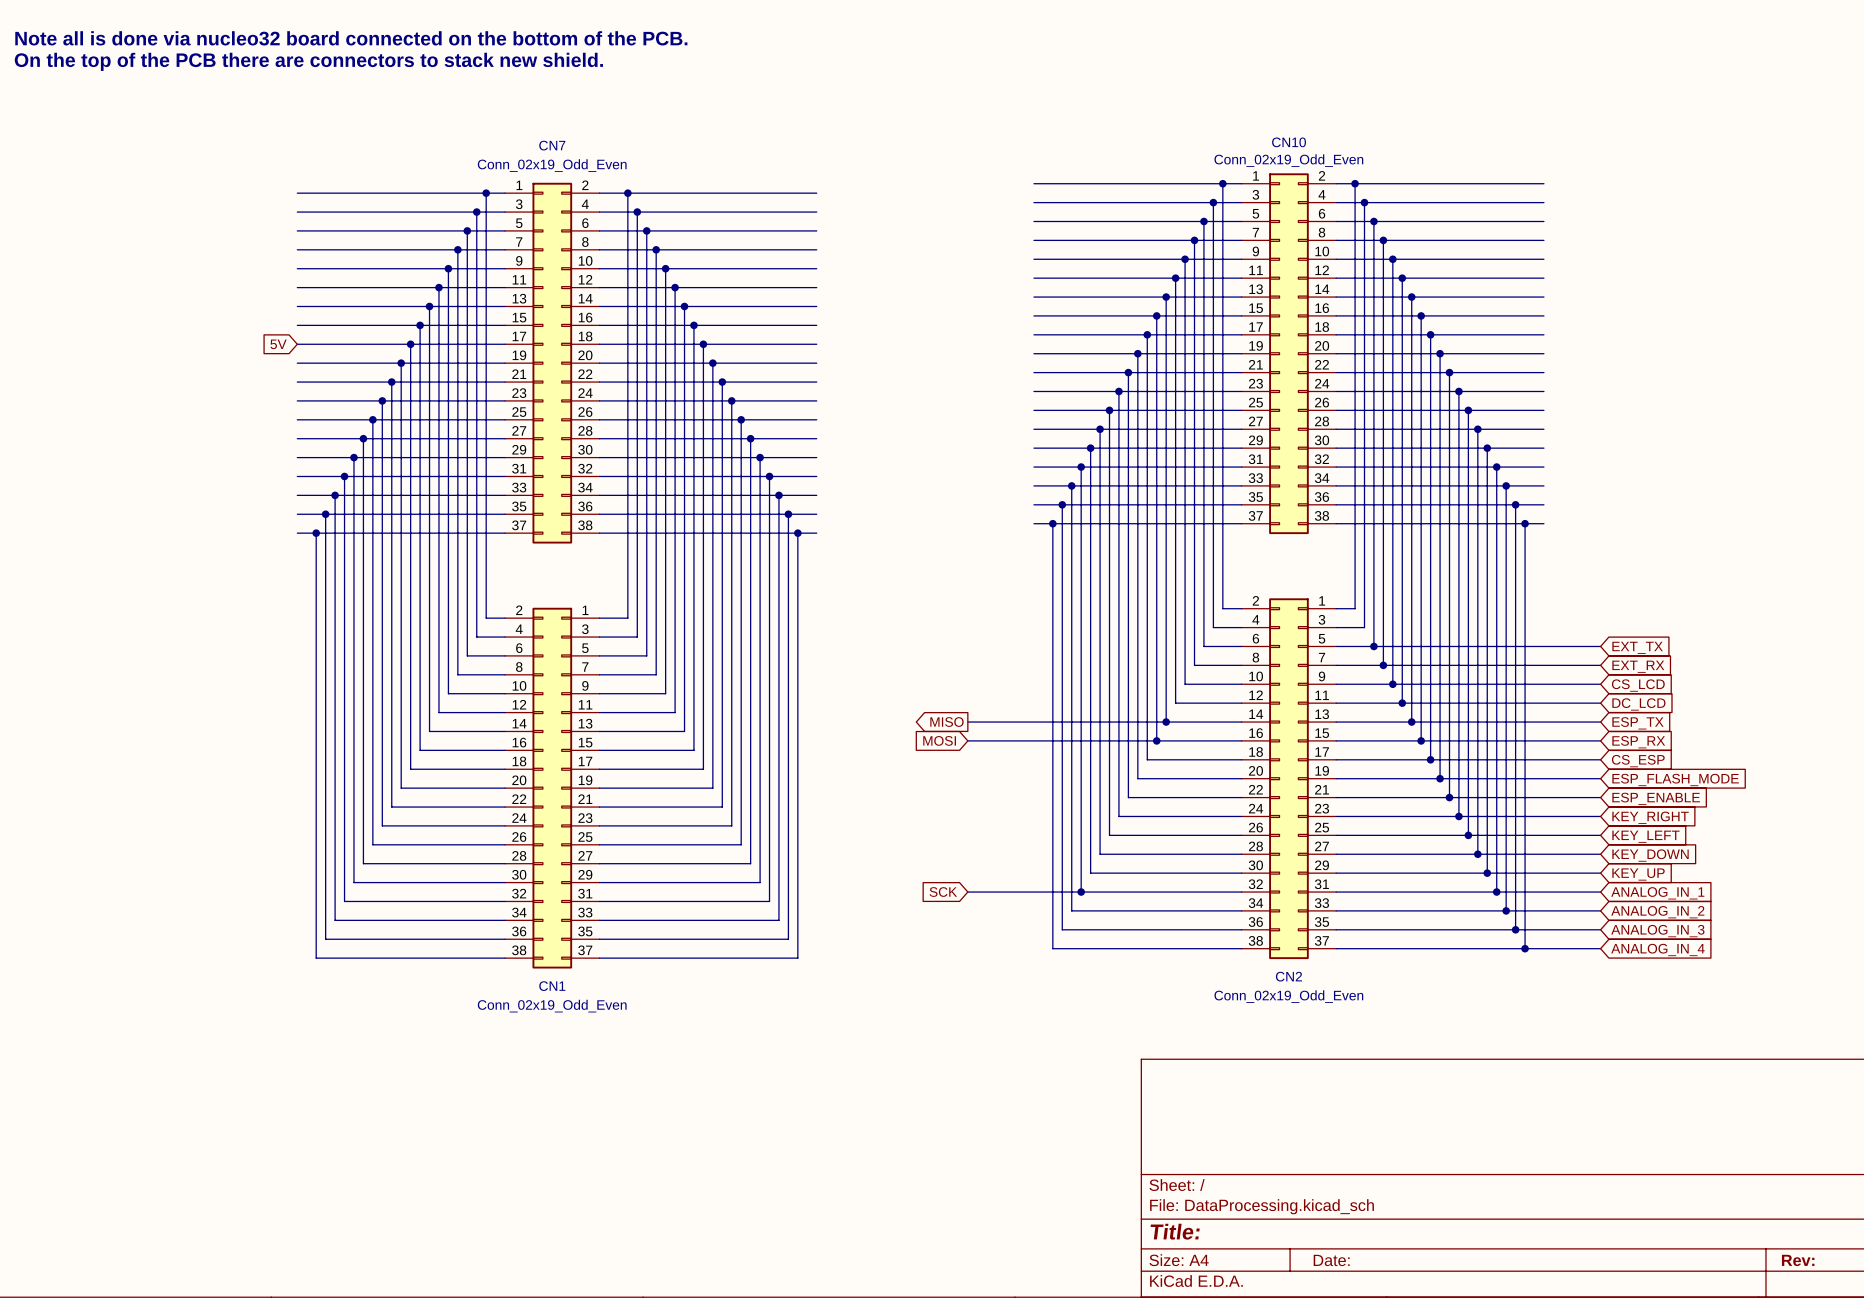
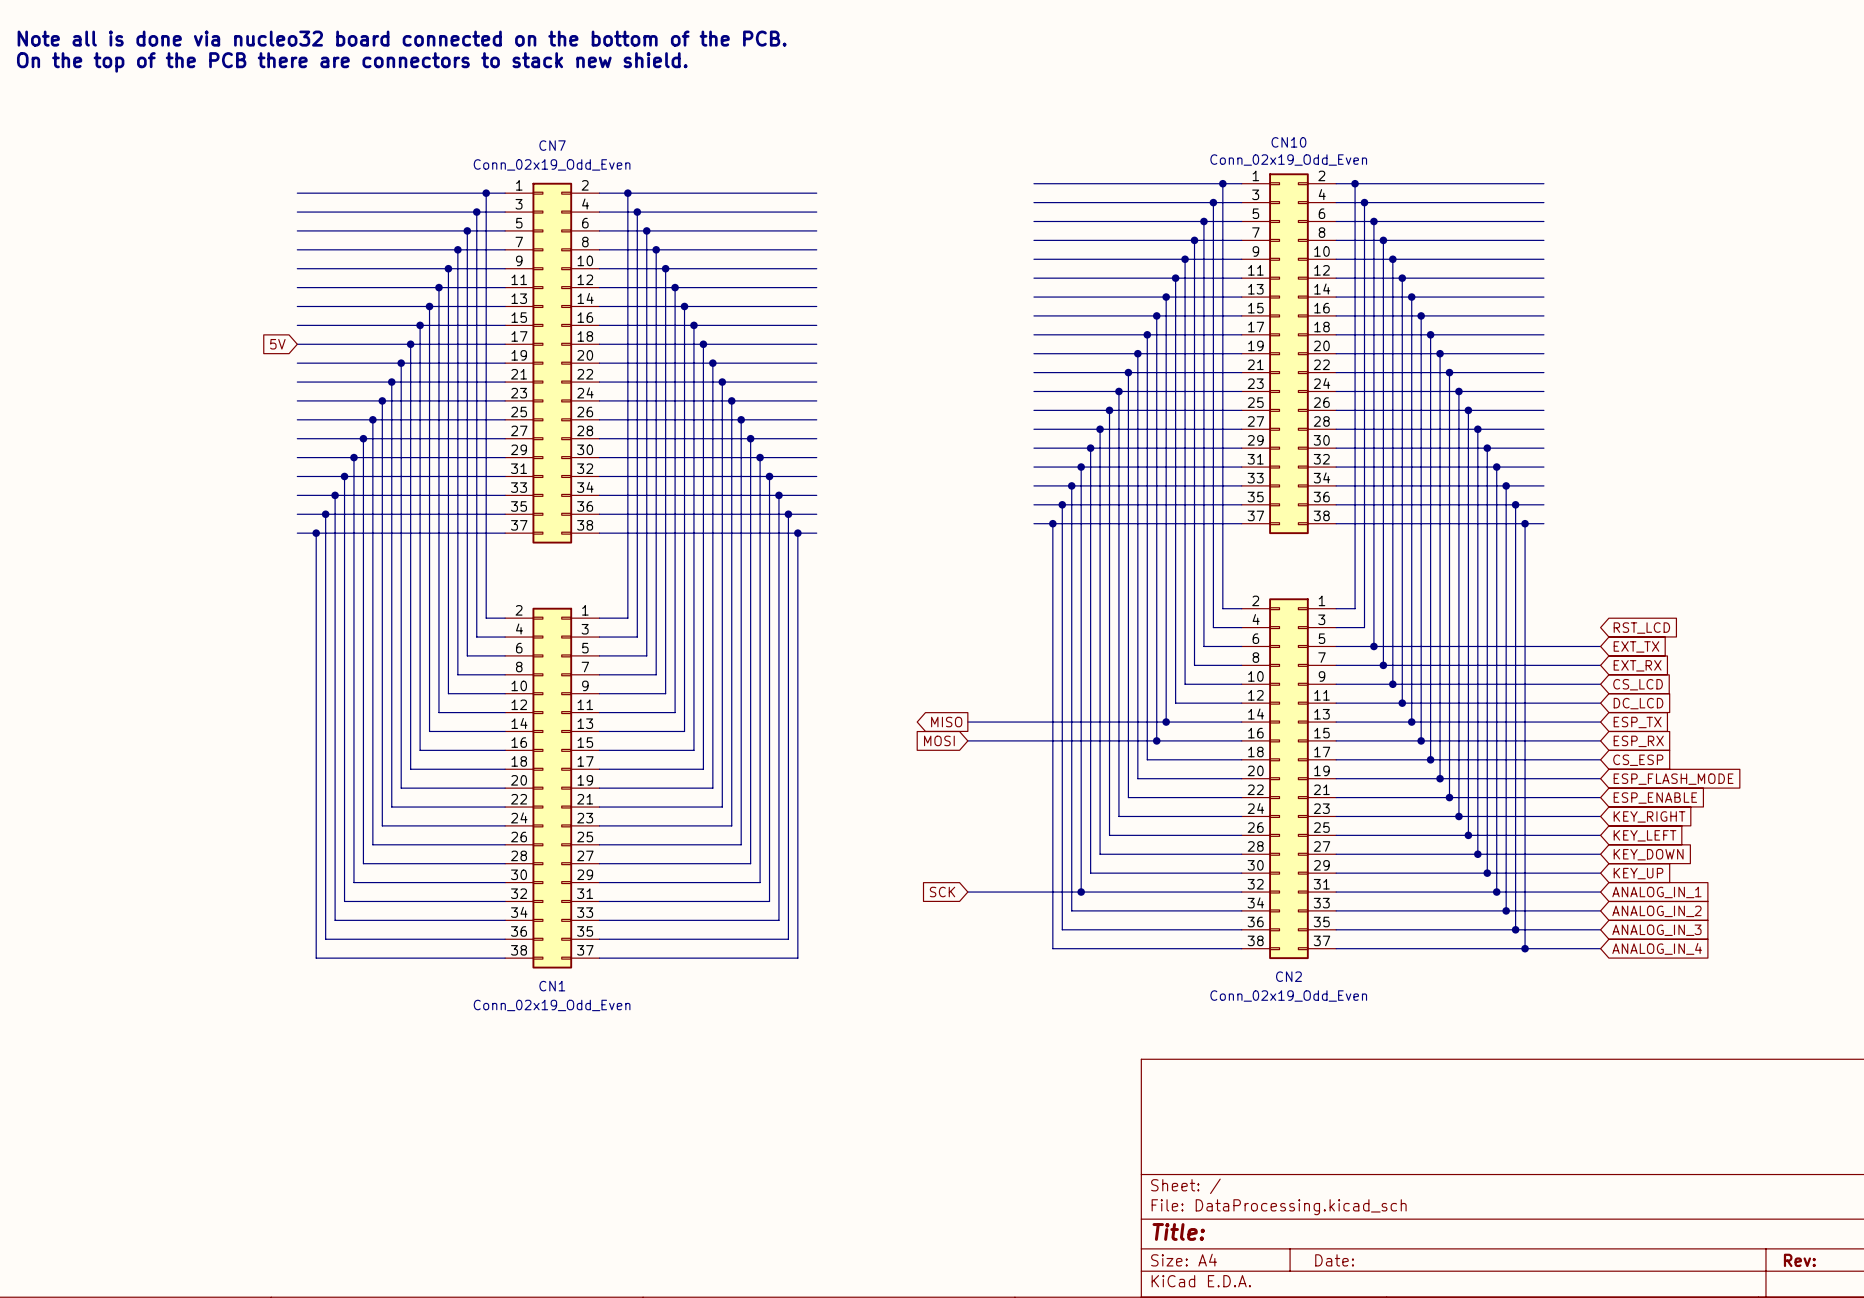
global label: none -> RST_LCD (1641, 628)

